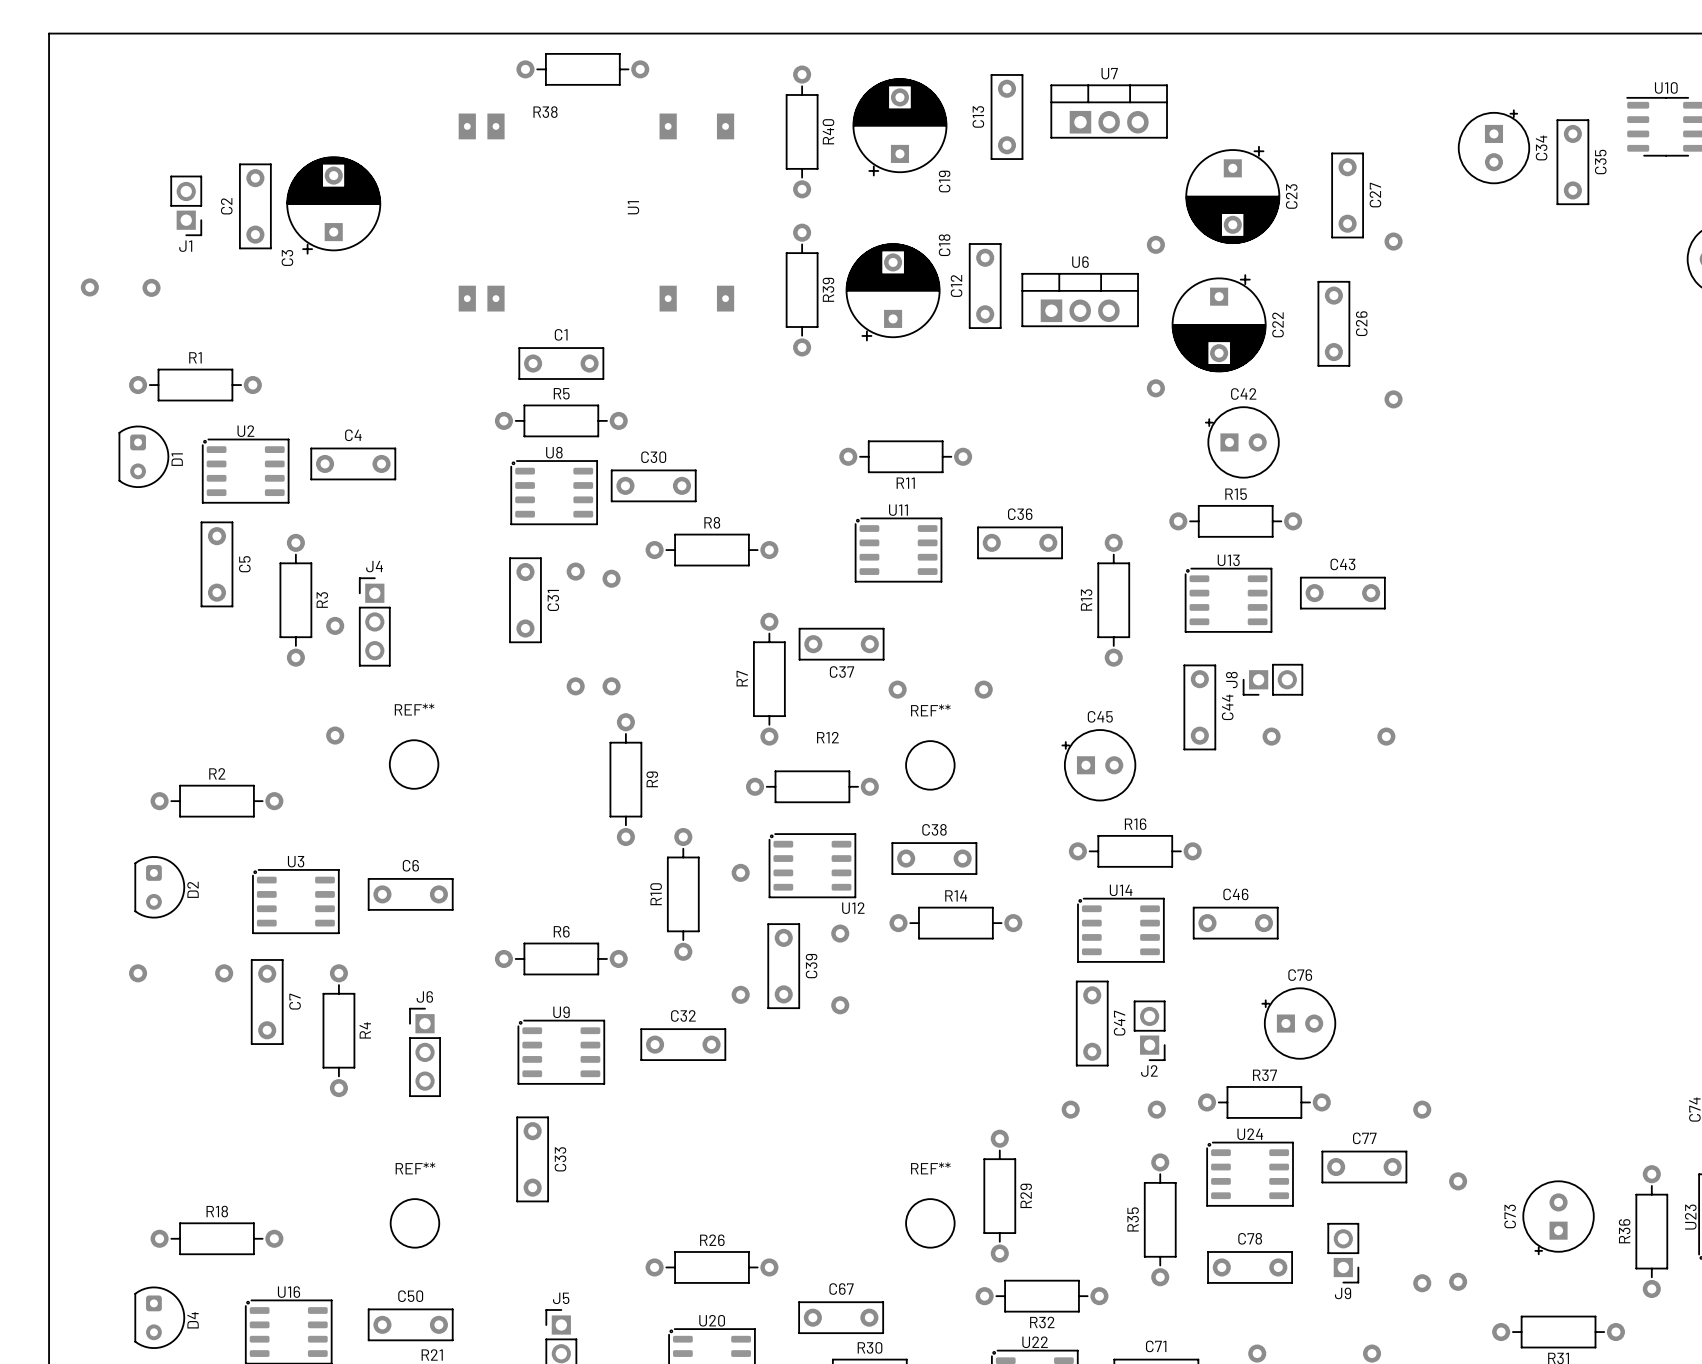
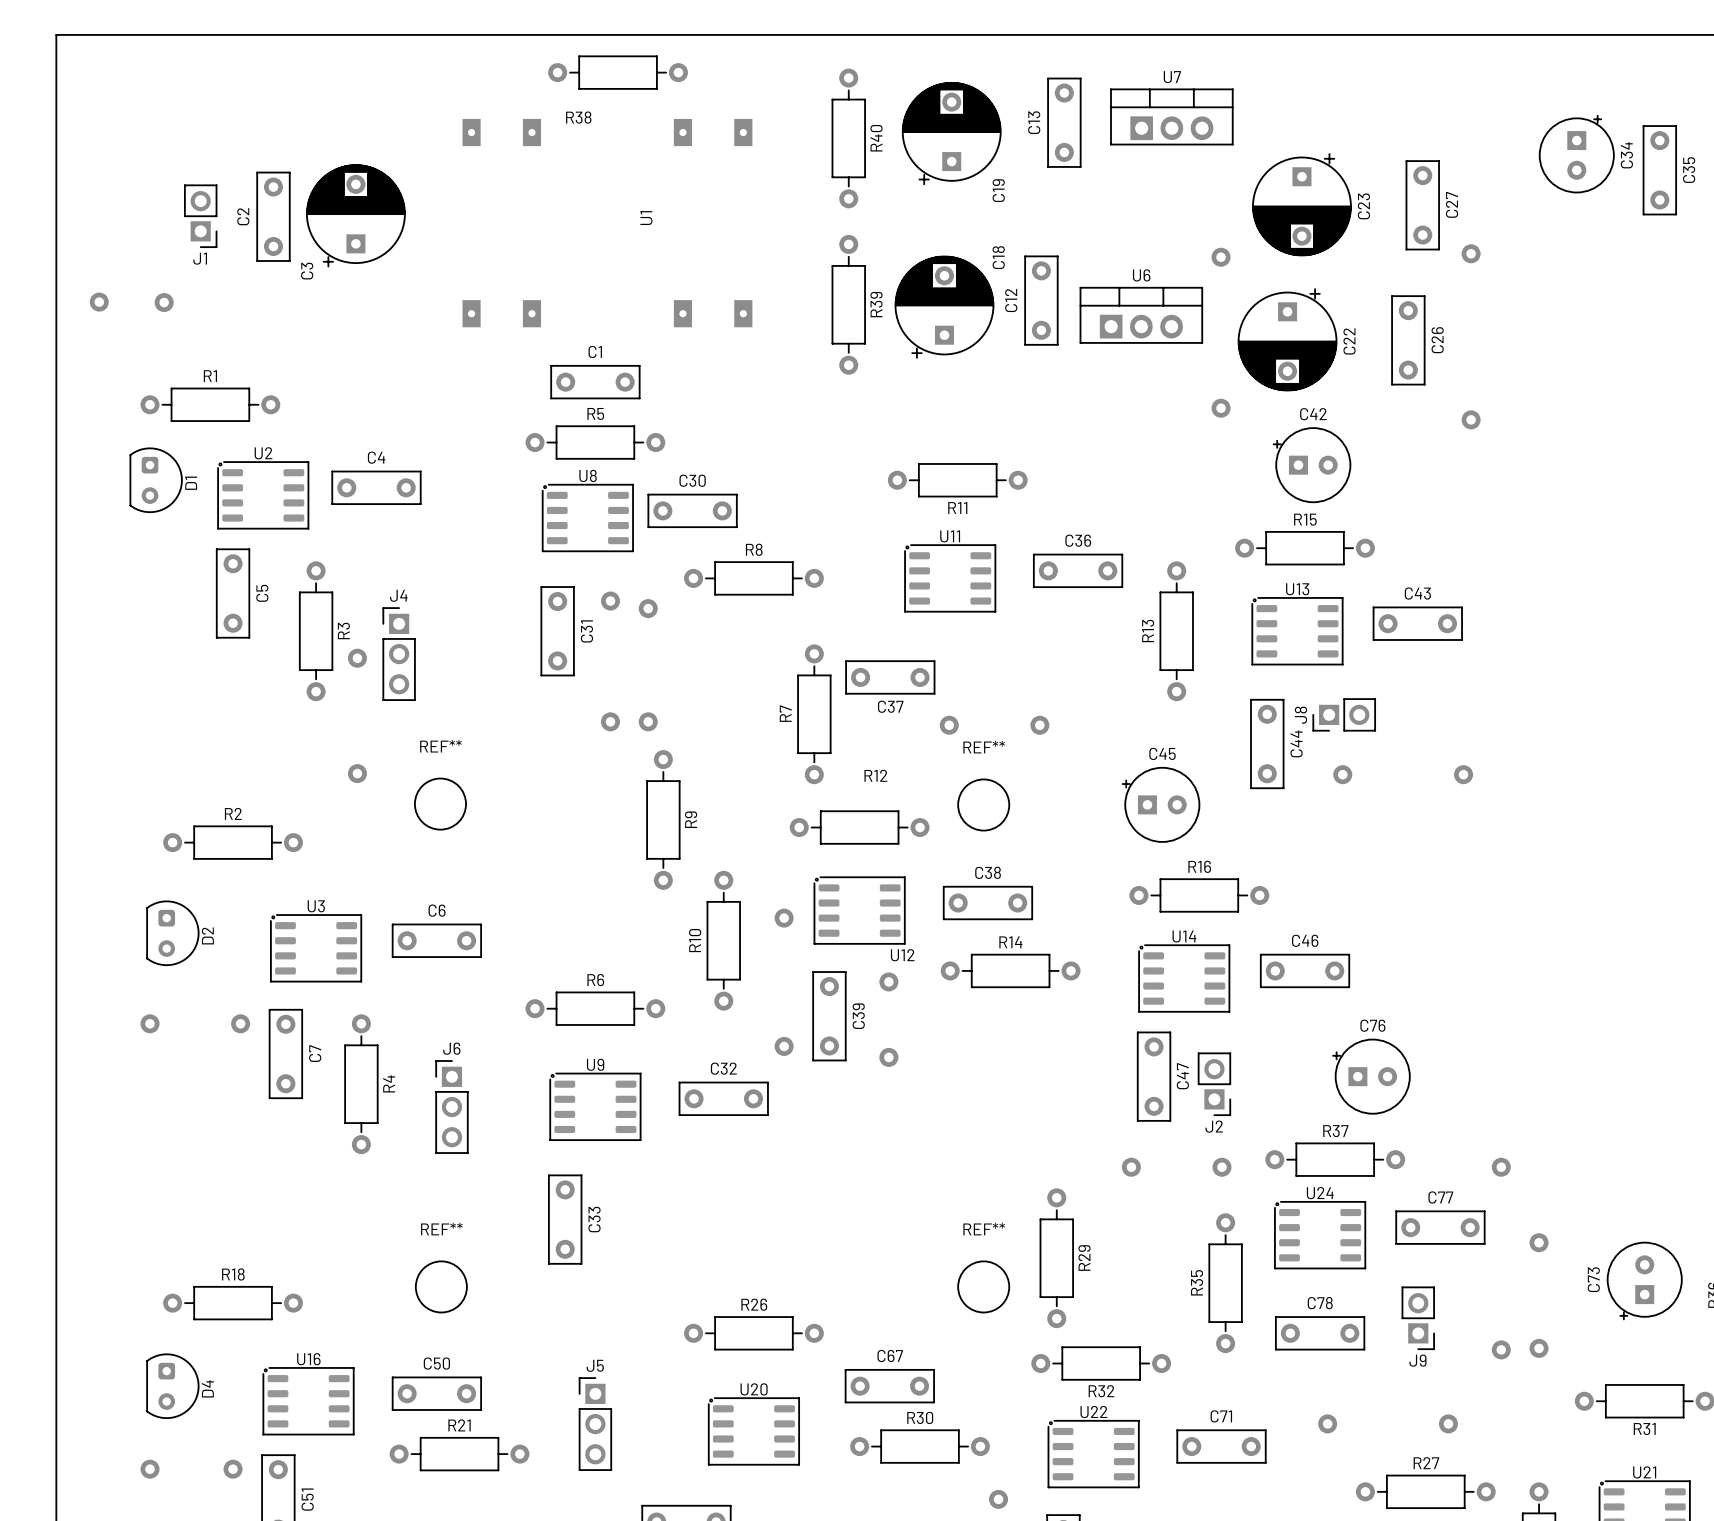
U1 footprint: [458, 113, 735, 312] -> [462, 118, 753, 328]

